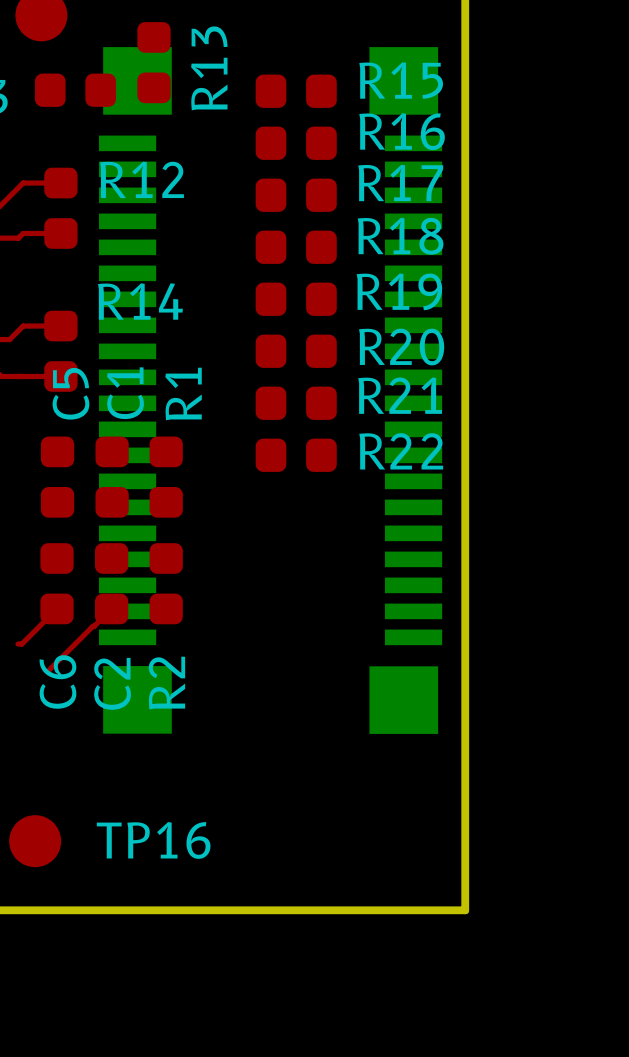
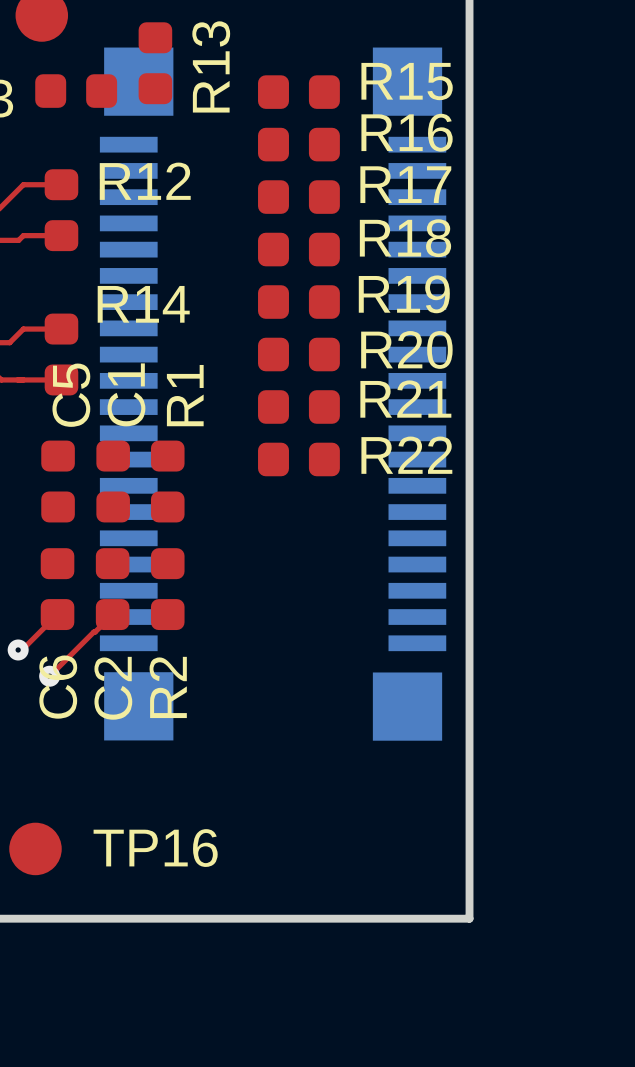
via: none -> (18, 649)
via: none -> (49, 676)

